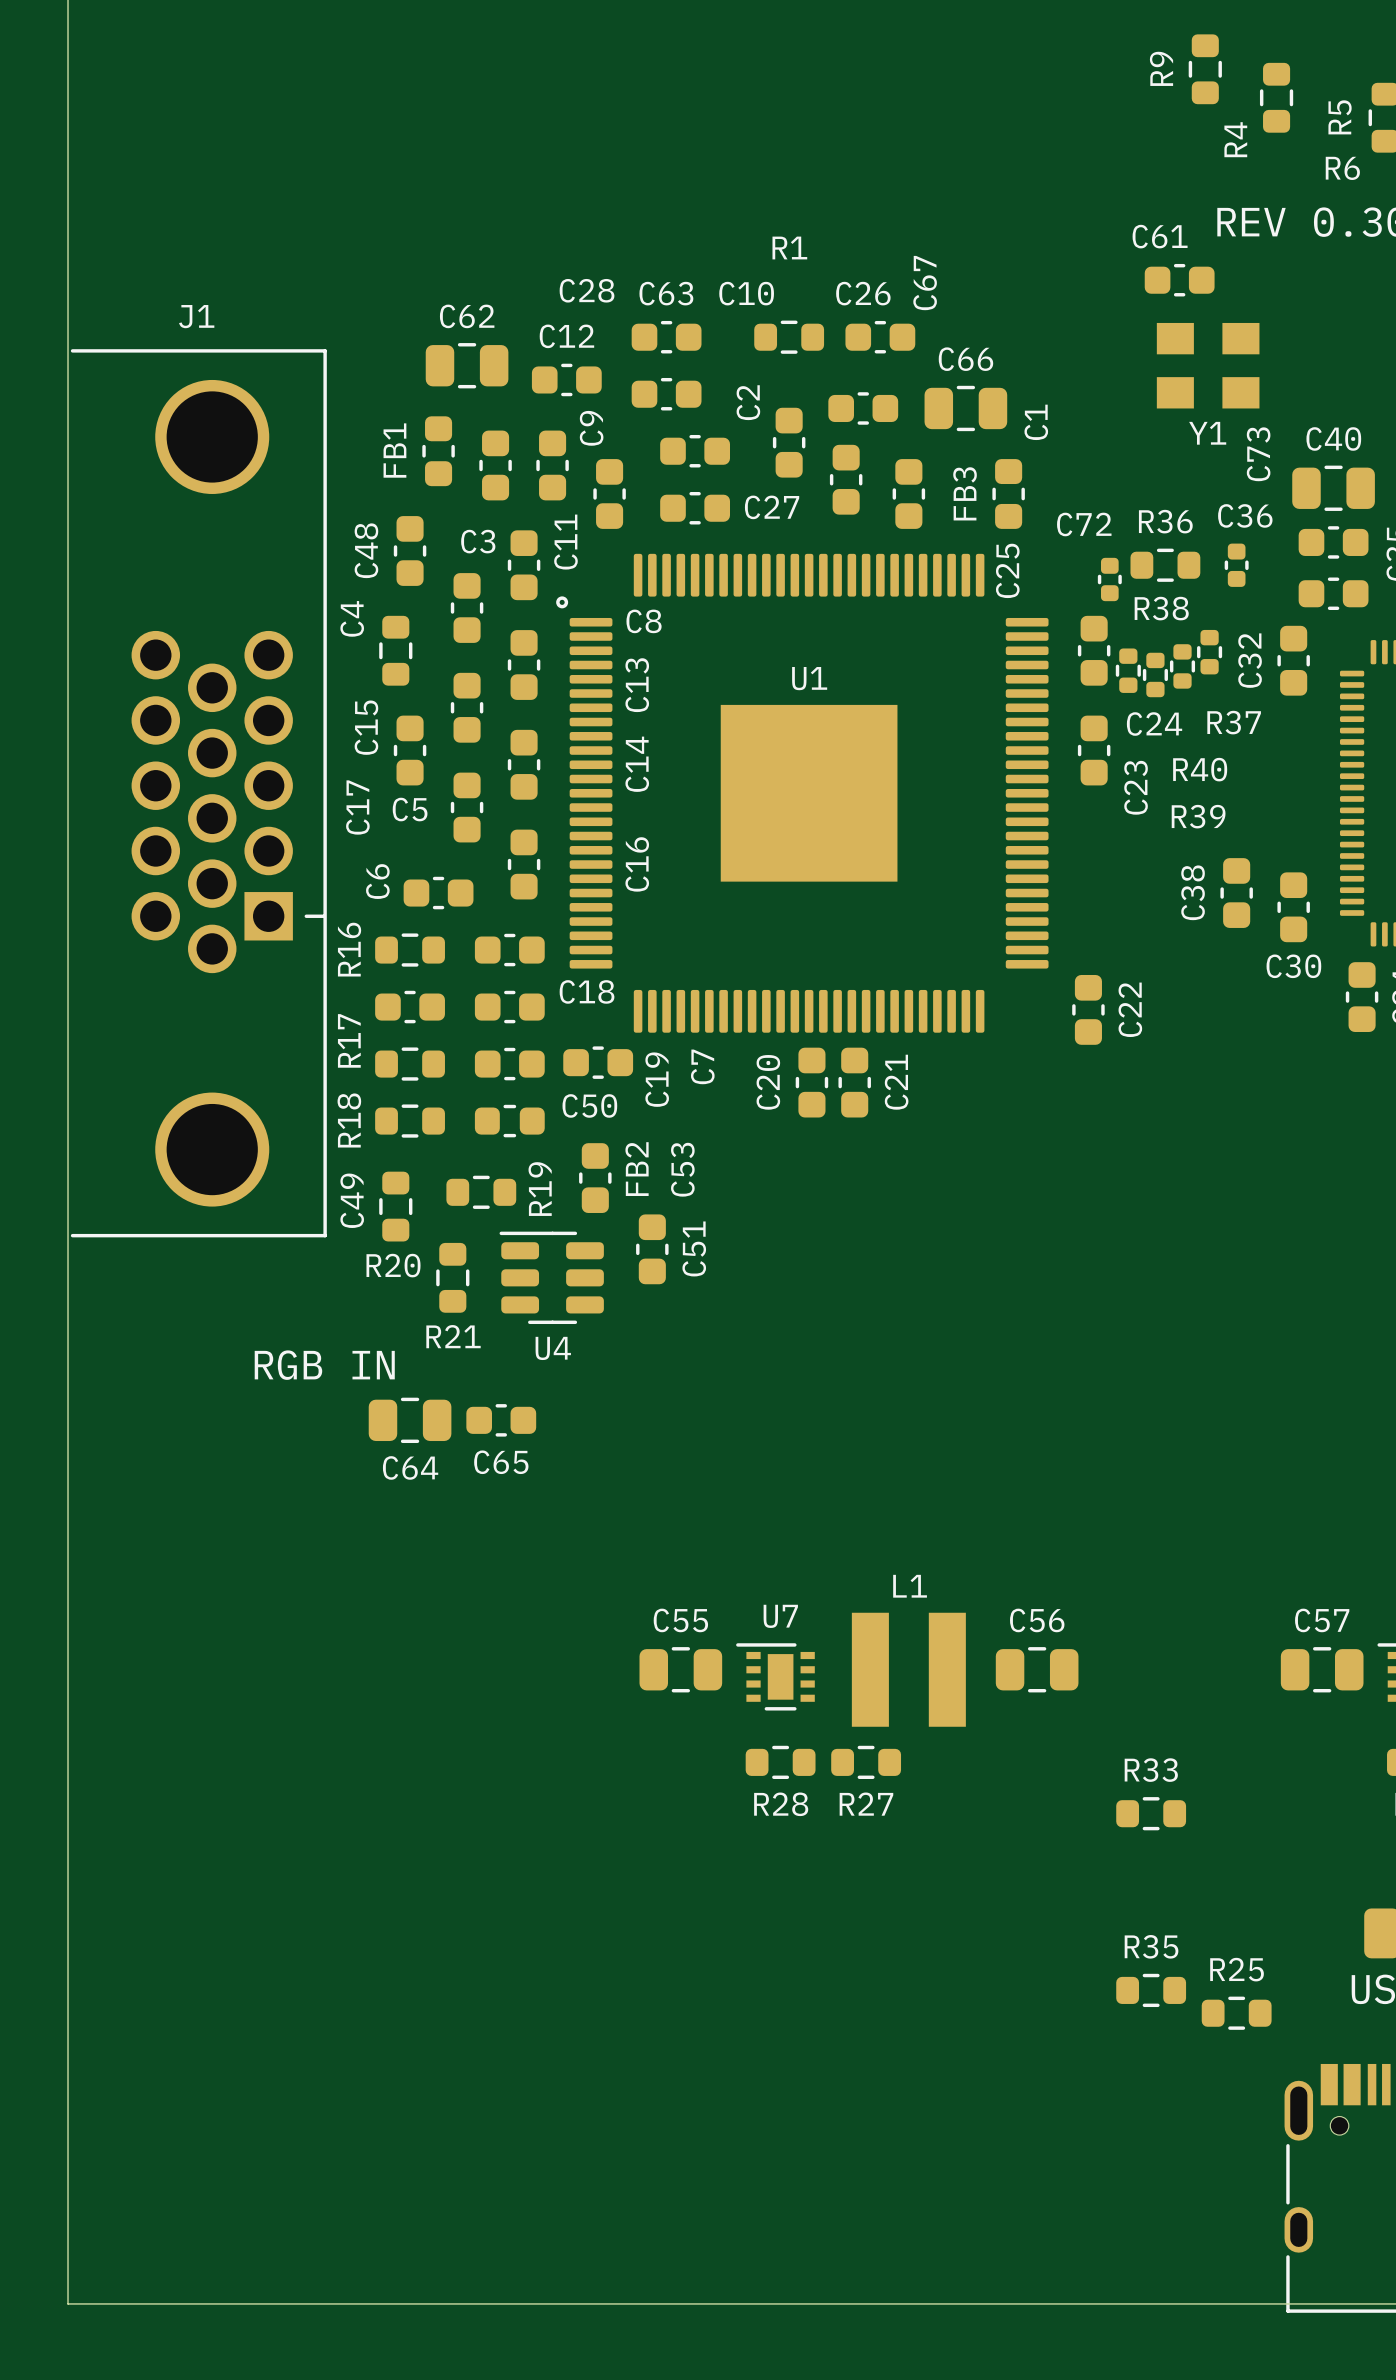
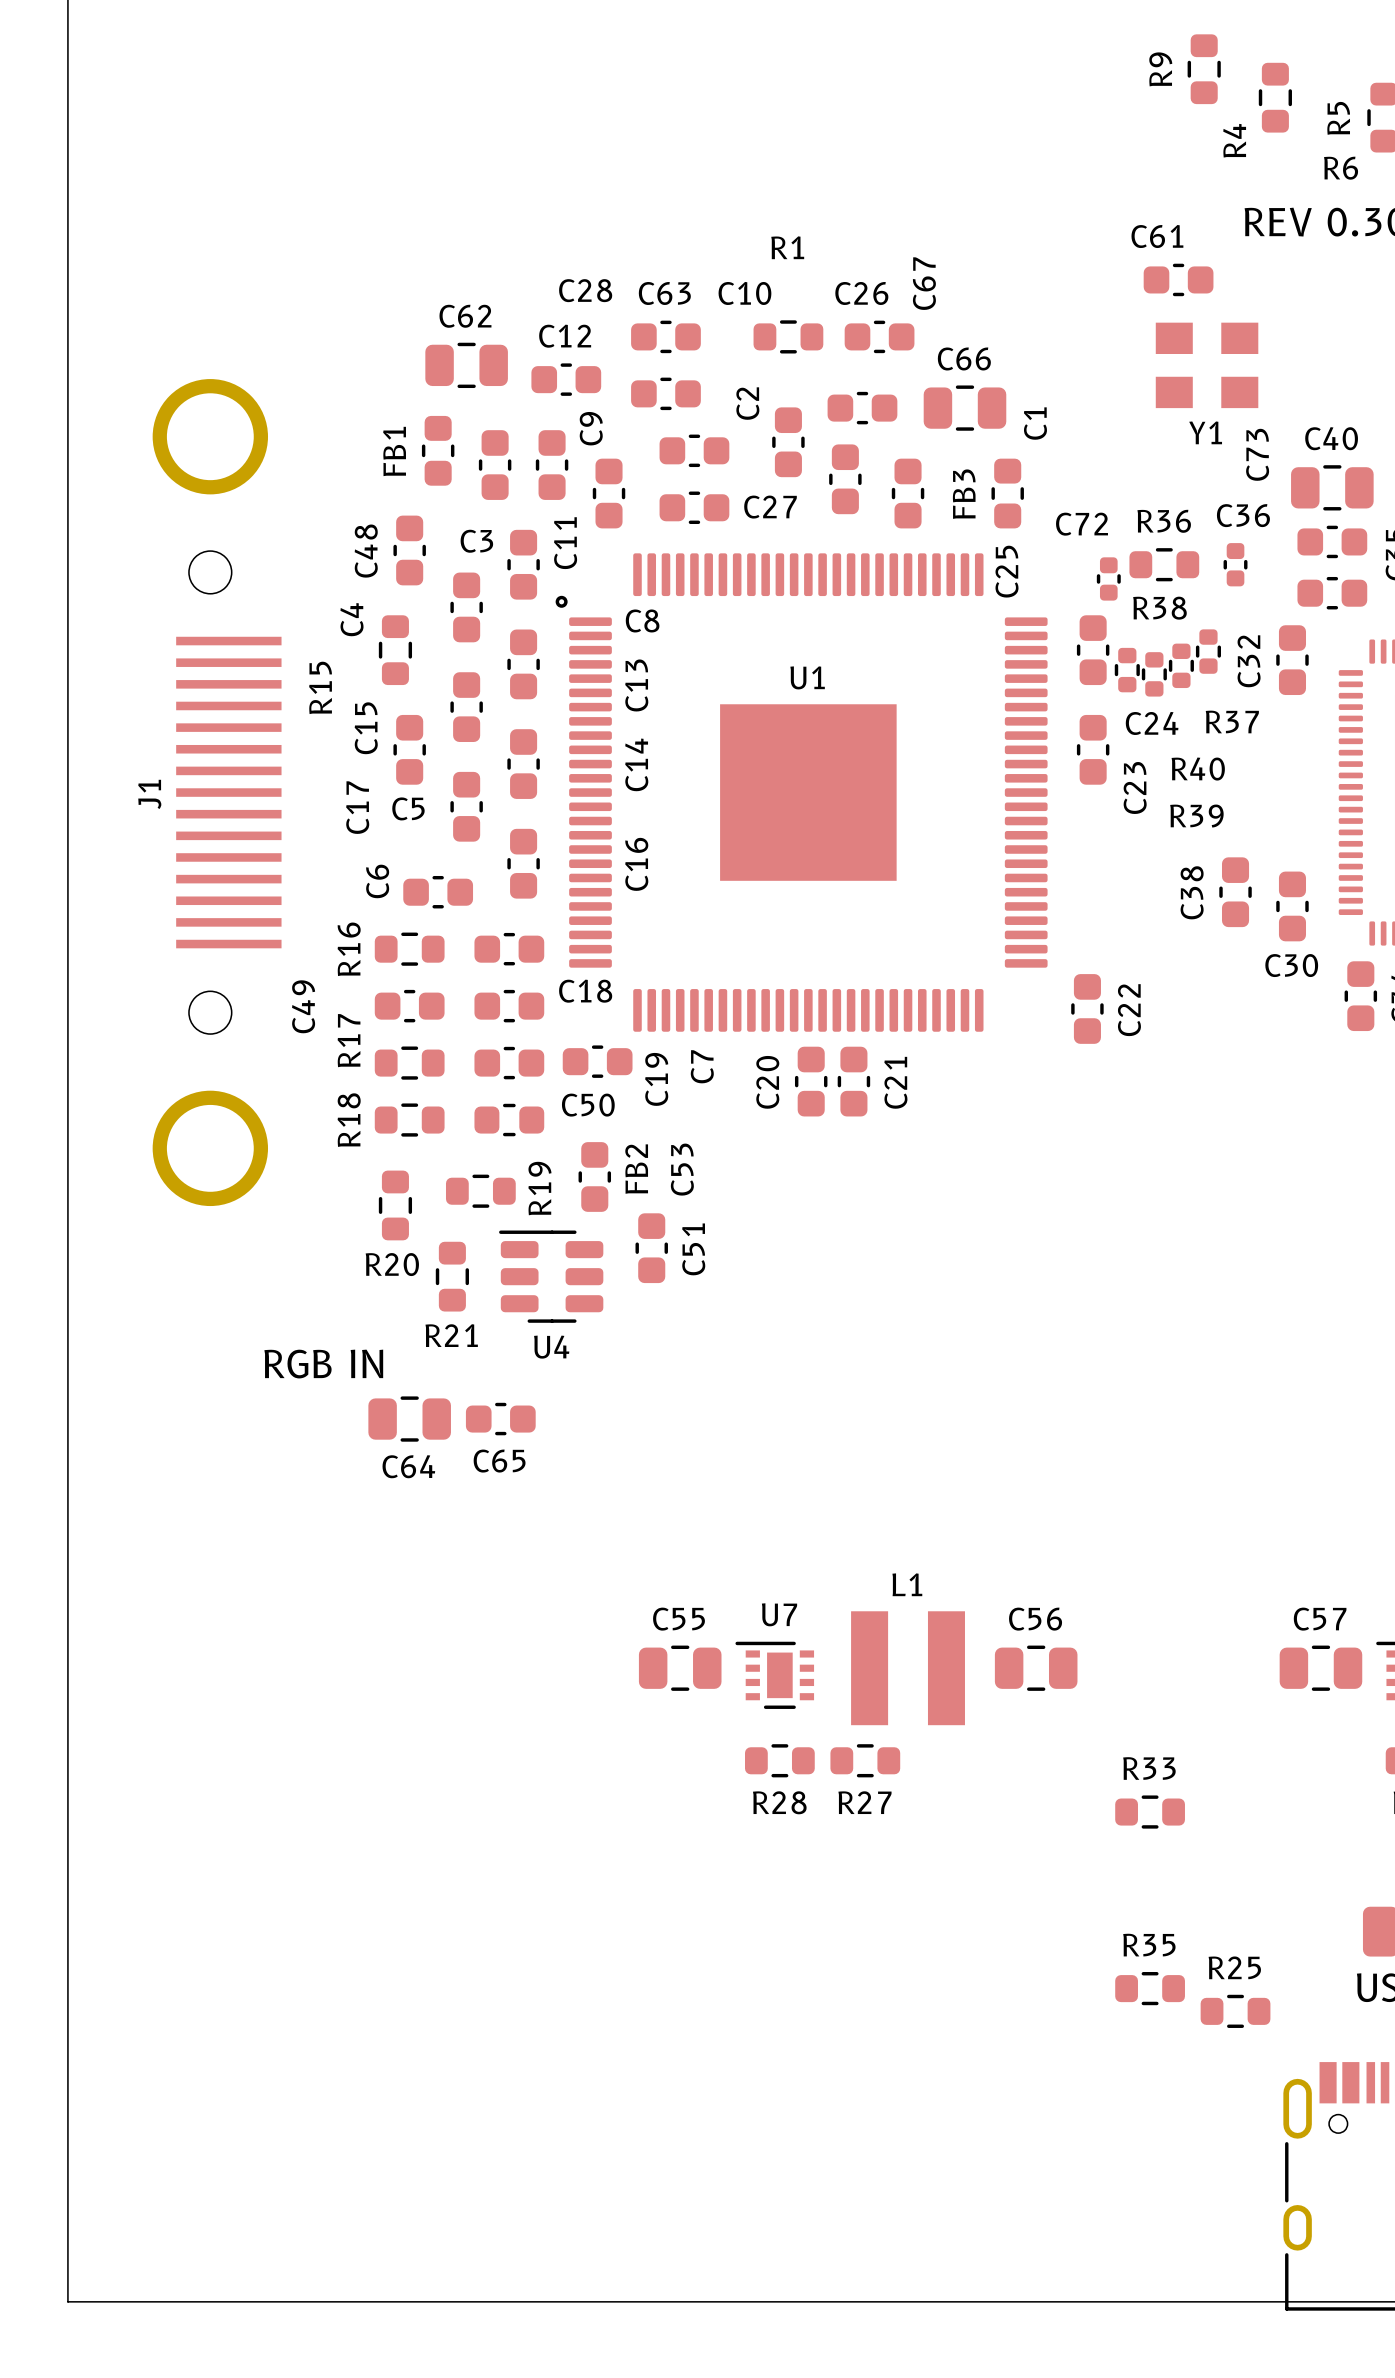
J1 name position: J1 (196, 316) -> J1 (149, 794)
J1 footprint: [70, 349, 327, 1238] -> [152, 379, 282, 1207]
R15 name: none -> R15 (320, 687)
C49 name position: C49 (352, 1200) -> C49 (303, 1006)

